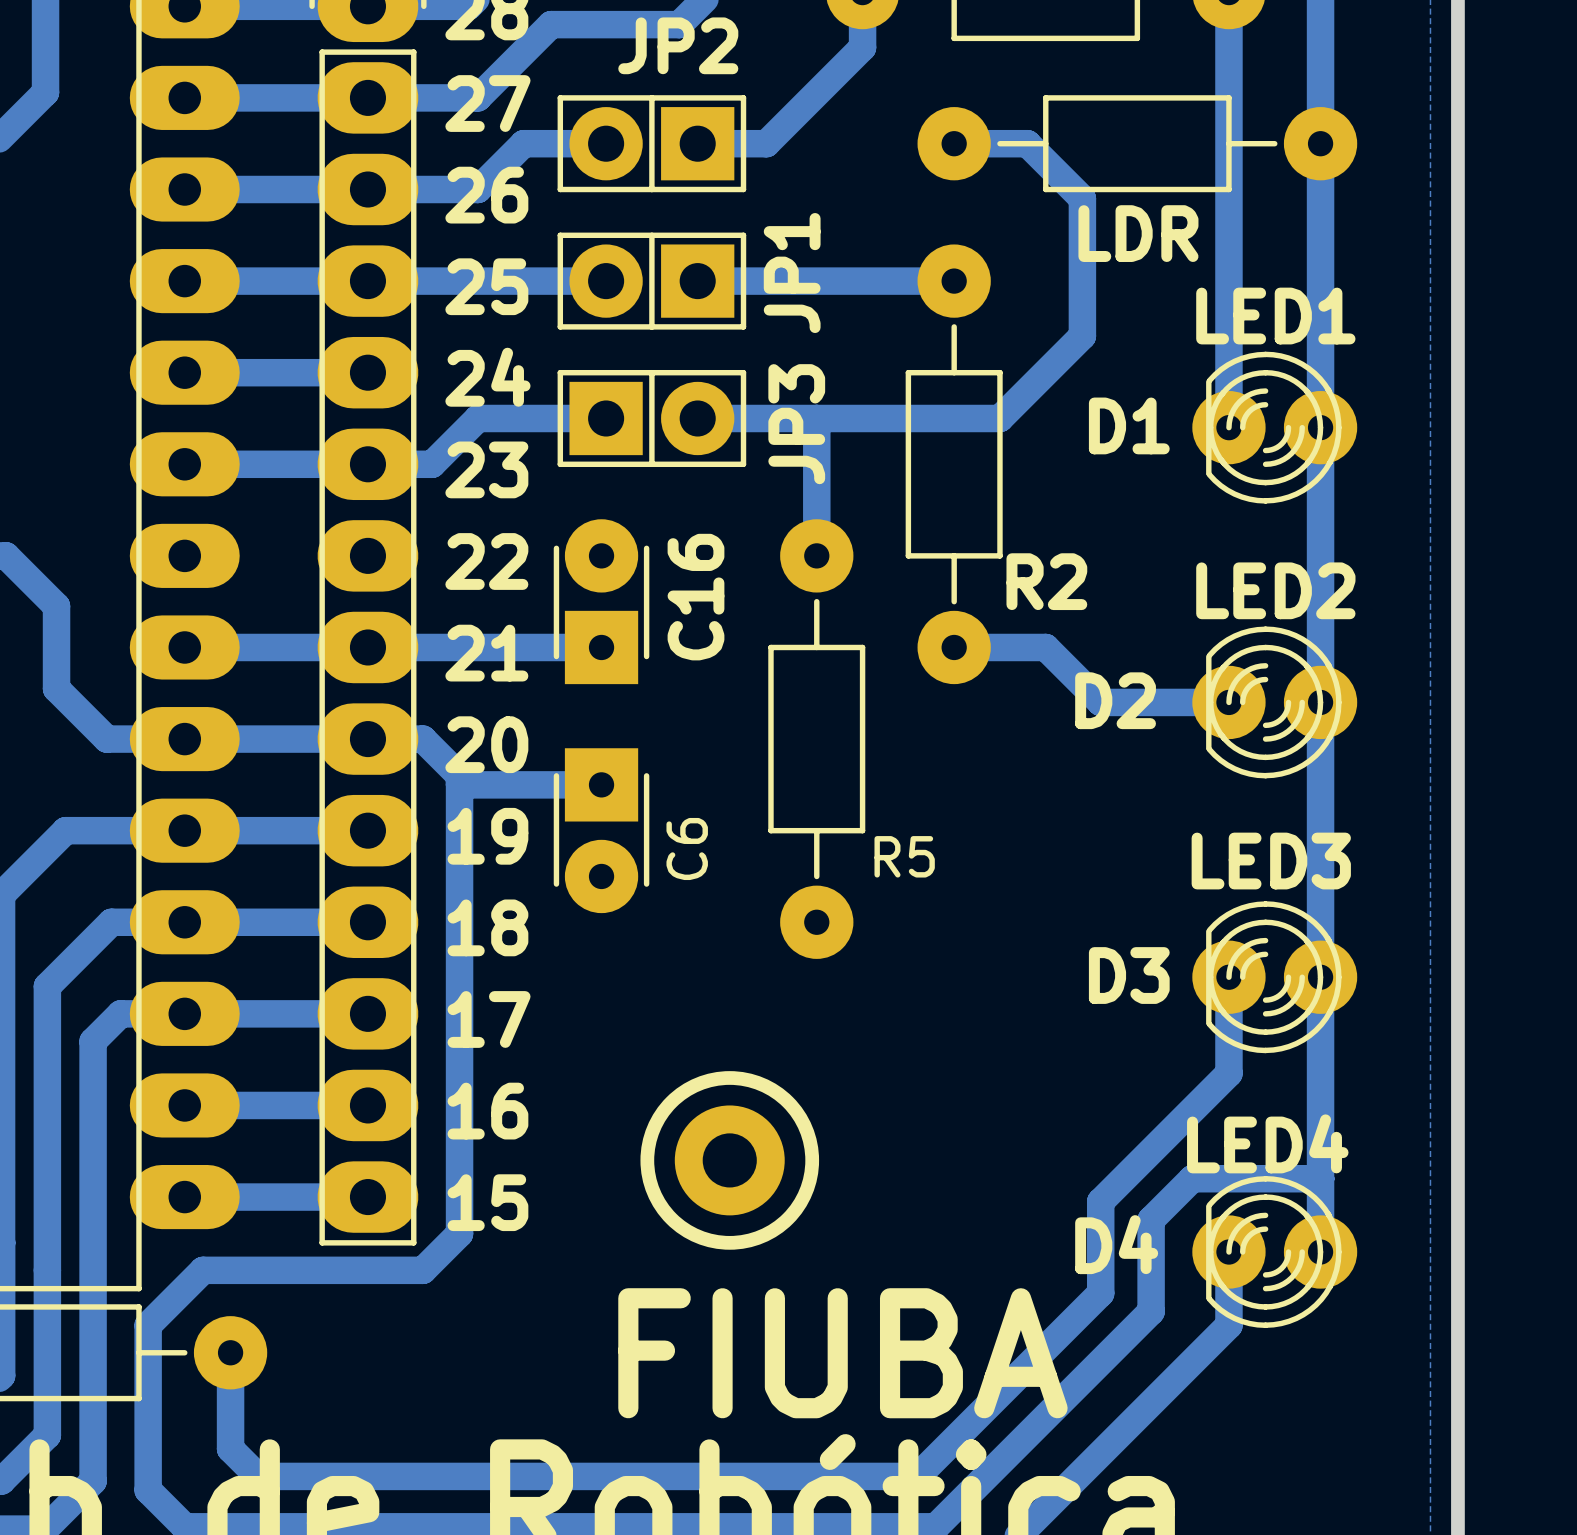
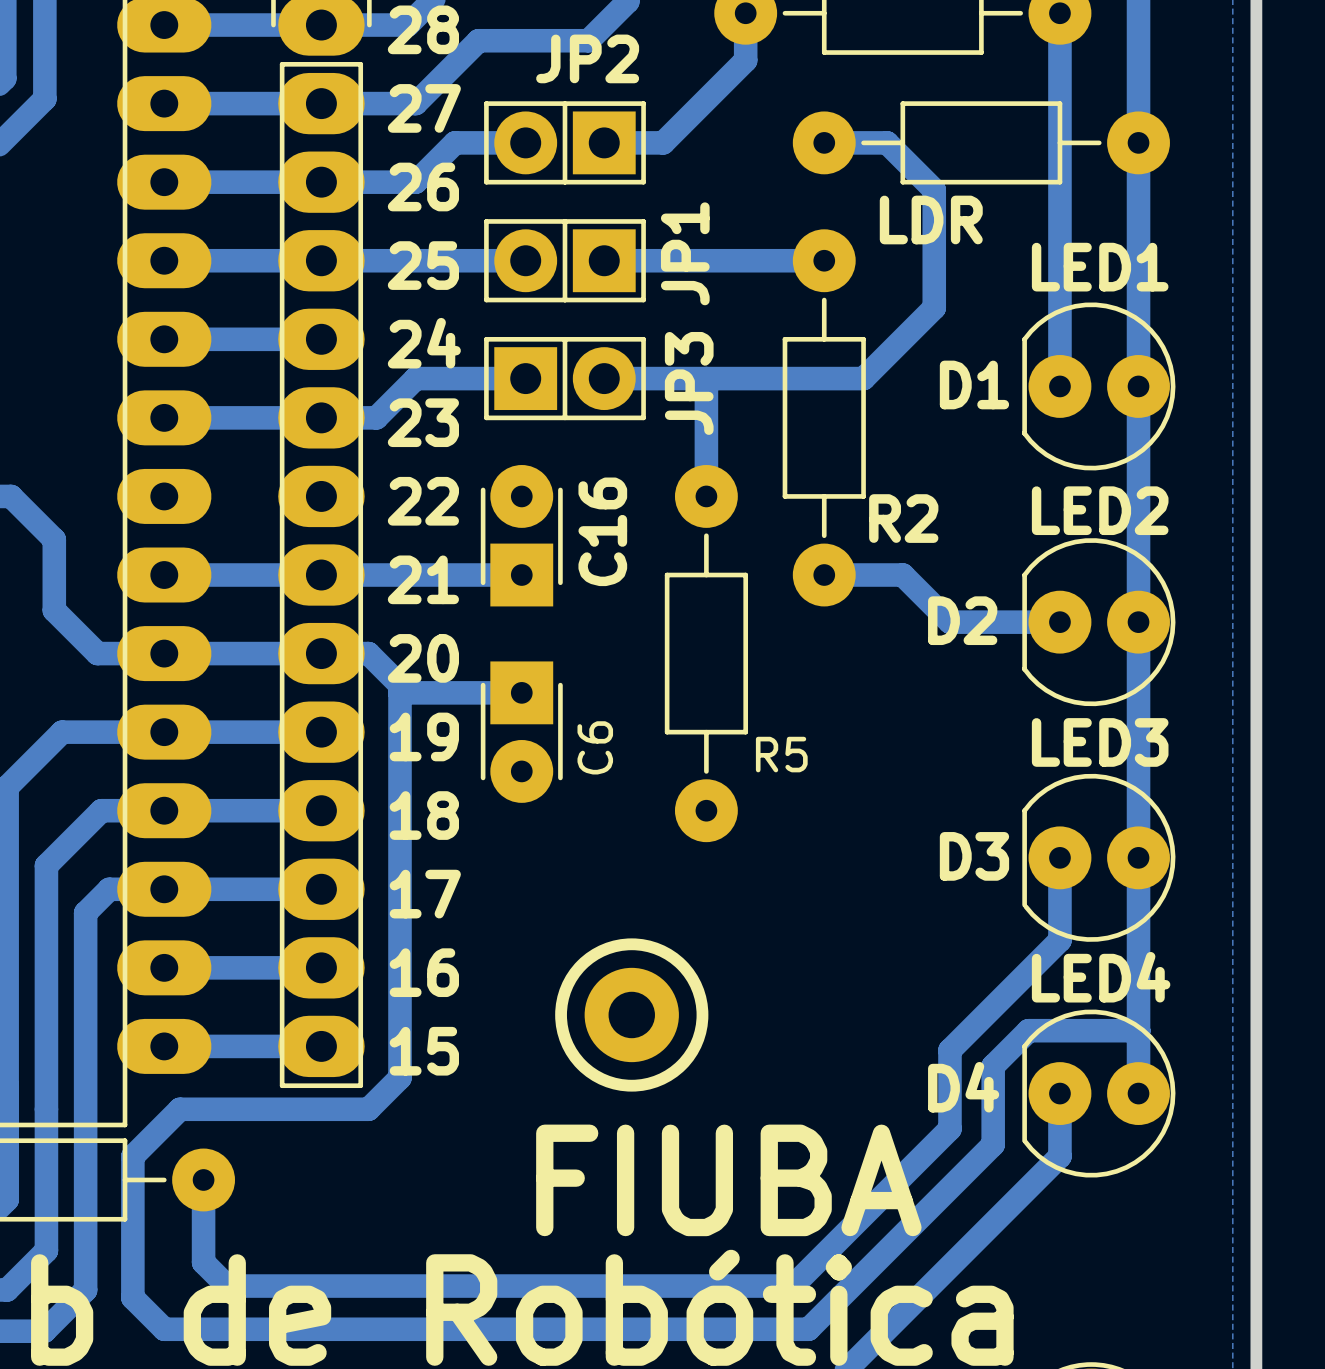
LDR name position: LDR (1138, 233) -> LDR (931, 219)
D1 footprint: [1192, 351, 1358, 504] -> [1021, 302, 1176, 471]
D2 footprint: [1192, 626, 1358, 779] -> [1021, 538, 1176, 707]
D3 footprint: [1192, 901, 1358, 1054] -> [1022, 773, 1176, 942]
D4 footprint: [1192, 1176, 1358, 1328] -> [1022, 1009, 1176, 1178]

